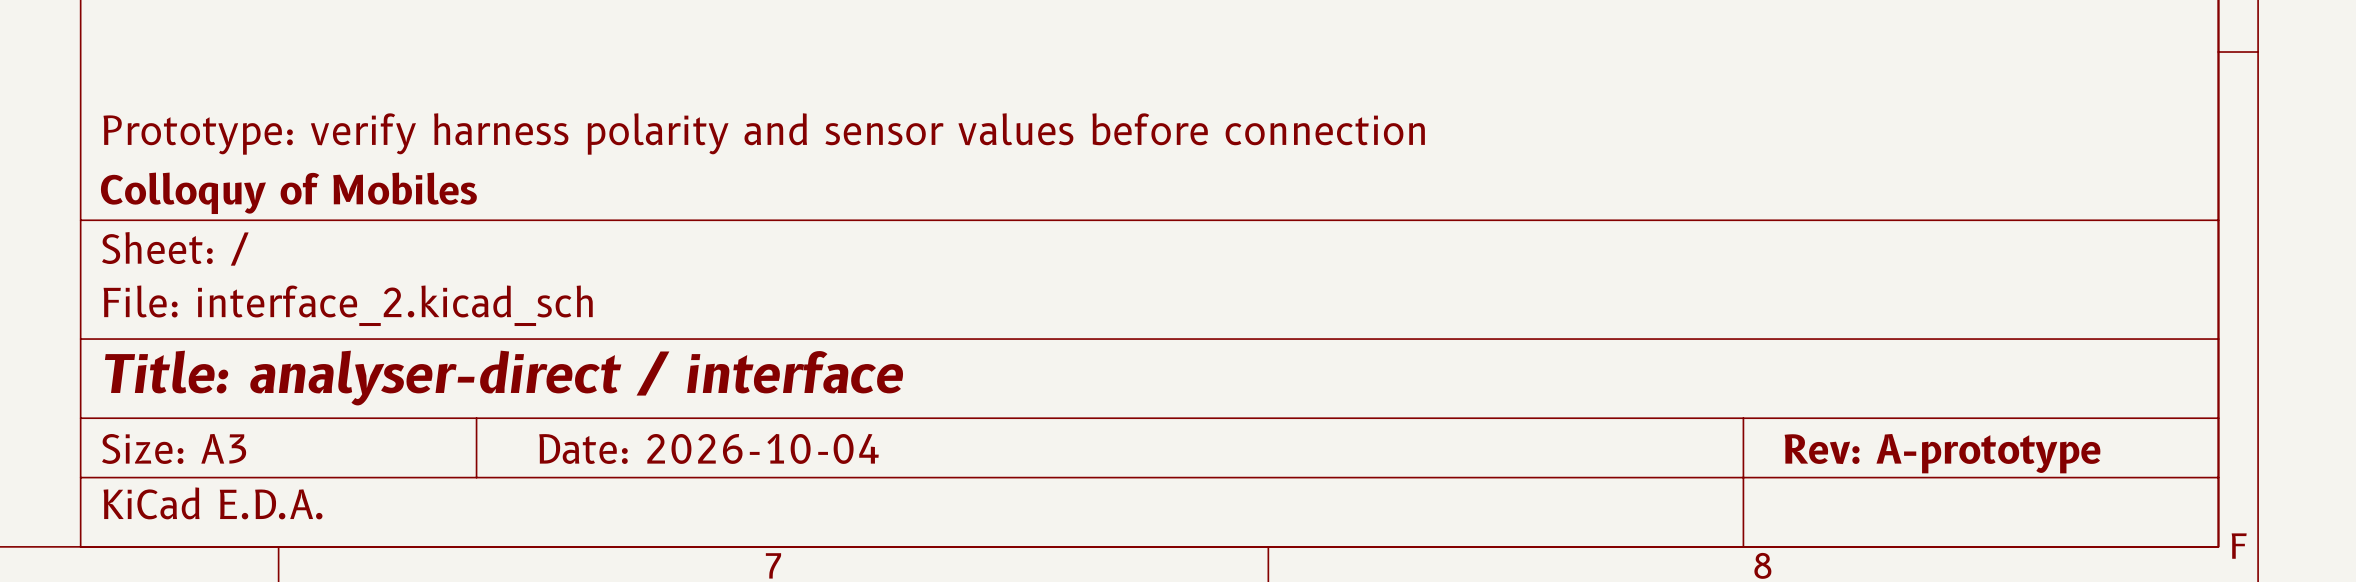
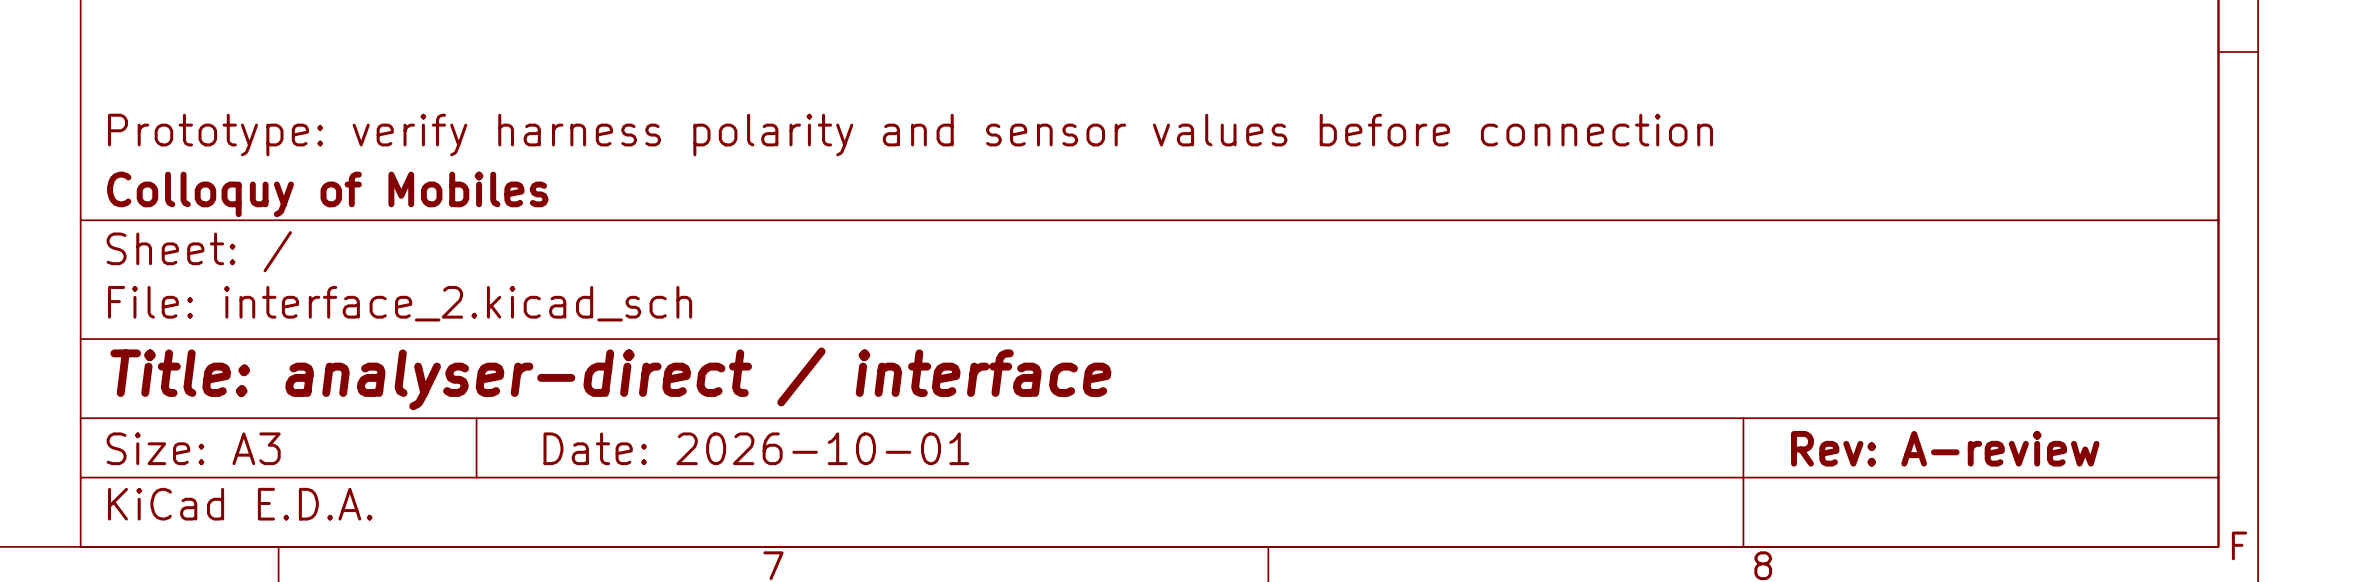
title block: Date: 2026-10-04 (709, 448) -> Date: 2026-10-01 (756, 448)
title block: Rev: A-prototype (1942, 453) -> Rev: A-review (1945, 448)

